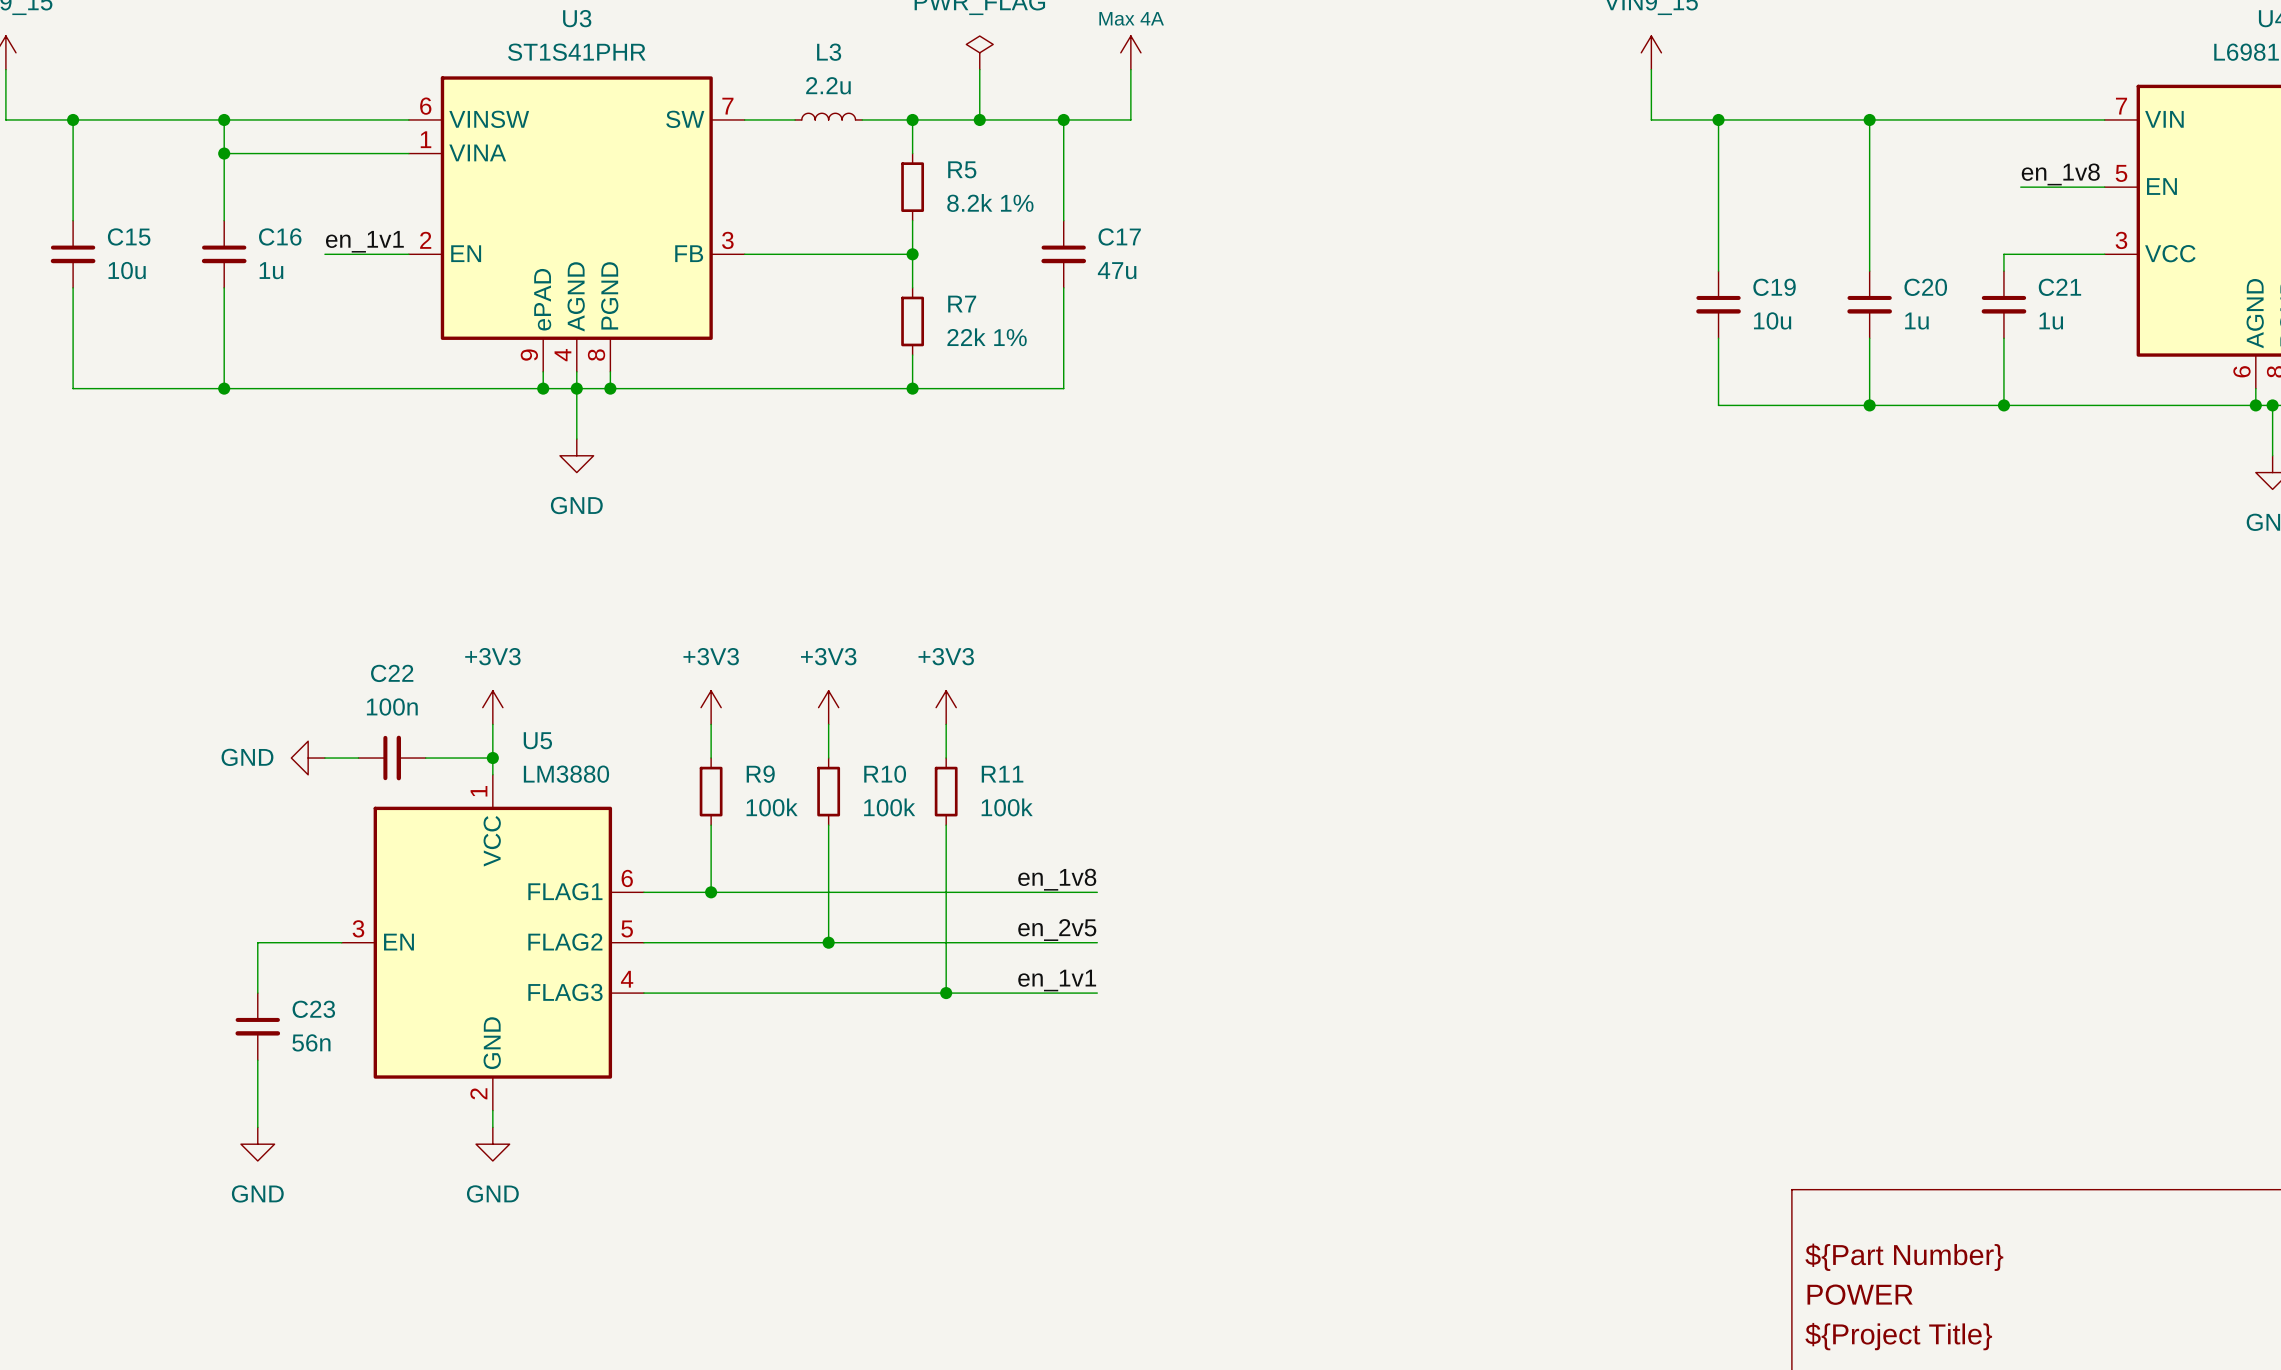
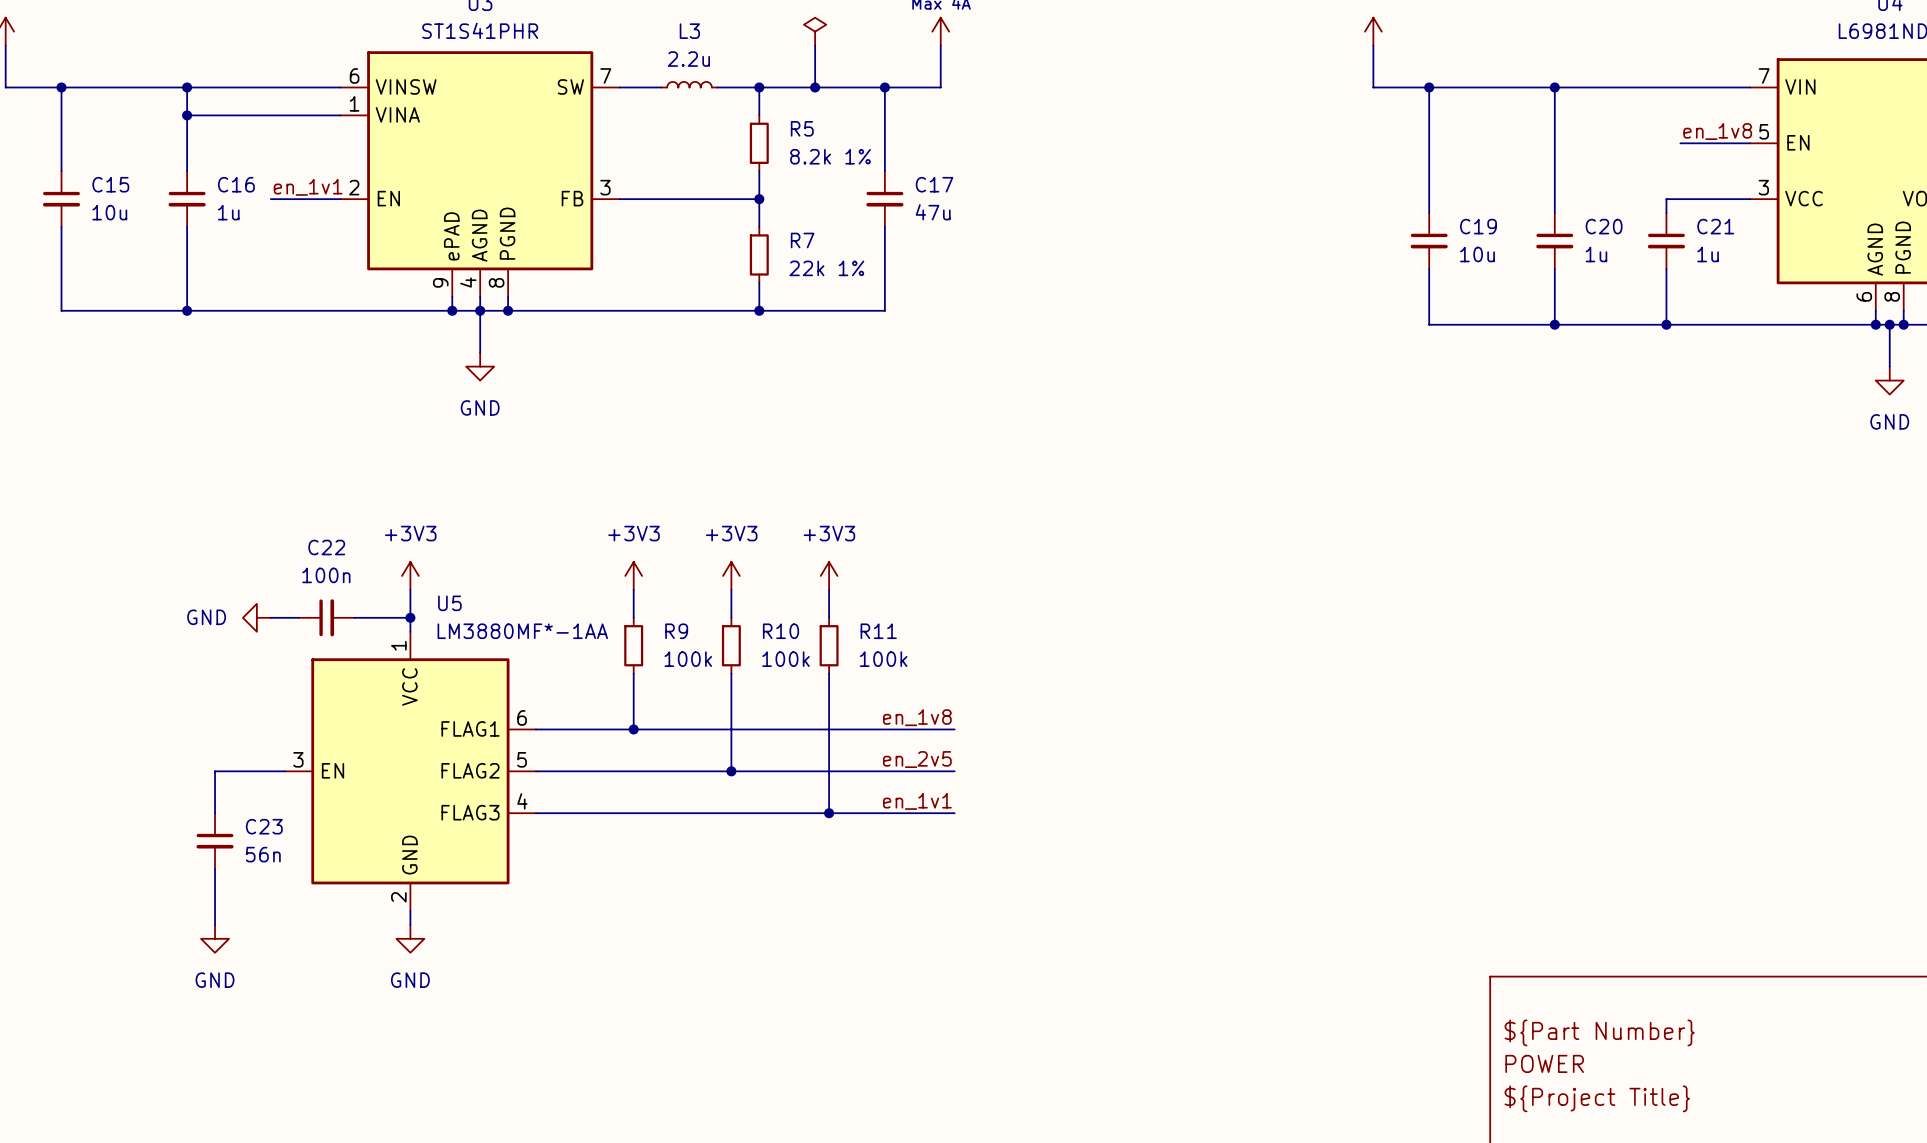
power symbol: +3V3 (711, 707) -> none
power symbol: none -> +3V3 (633, 575)
power symbol: +3V3 (828, 707) -> none
power symbol: none -> +3V3 (731, 575)
power symbol: +3V3 (946, 707) -> none
power symbol: none -> +3V3 (829, 575)
wire: (711, 724) (711, 758) -> (633, 589) (633, 617)
wire: (828, 724) (828, 758) -> (731, 589) (731, 617)
wire: (946, 724) (946, 758) -> (829, 589) (829, 617)
U5 value: LM3880 (566, 774) -> LM3880MF*-1AA (522, 631)
R9 position: (711, 791) -> (633, 645)
R10 position: (828, 791) -> (731, 645)
R11 position: (946, 791) -> (829, 645)
wire: (711, 825) (711, 892) -> (633, 673) (633, 729)
wire: (828, 825) (828, 942) -> (731, 673) (731, 771)
wire: (946, 825) (946, 993) -> (829, 673) (829, 813)
label position: en_1v8 (1057, 879) -> en_1v8 (917, 717)
junction: (711, 892) -> none
junction: none -> (633, 729)
wire: none -> (912, 729) (954, 729)
label position: en_2v5 (1057, 930) -> en_2v5 (917, 759)
junction: (828, 942) -> none
junction: none -> (731, 771)
wire: none -> (912, 771) (954, 771)
label position: en_1v1 (1057, 980) -> en_1v1 (917, 801)
junction: (946, 993) -> none
junction: none -> (829, 813)
wire: none -> (912, 813) (954, 813)

